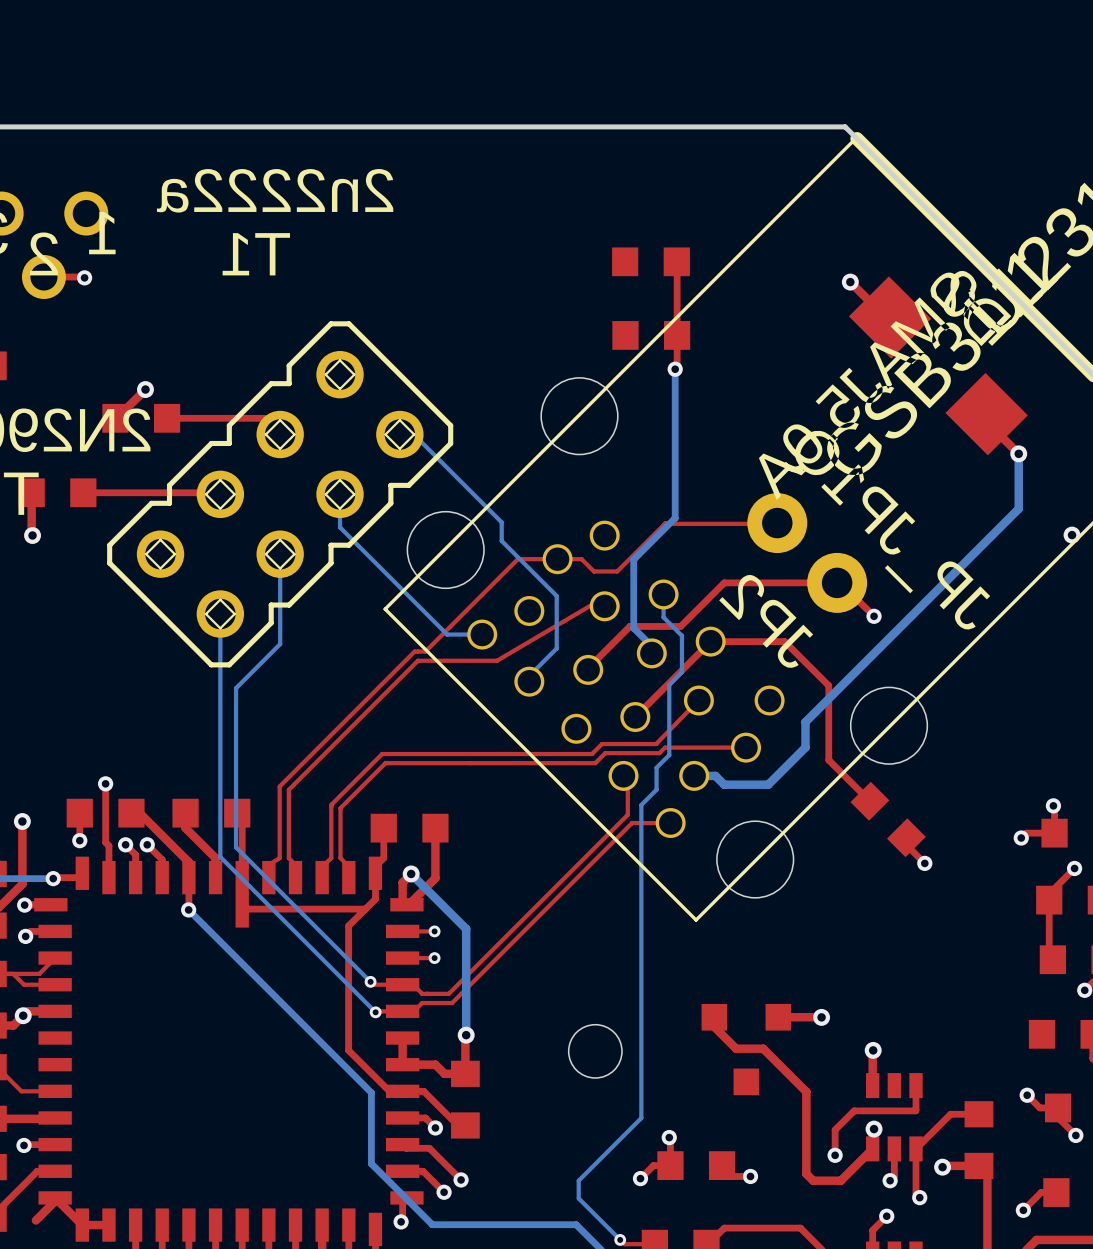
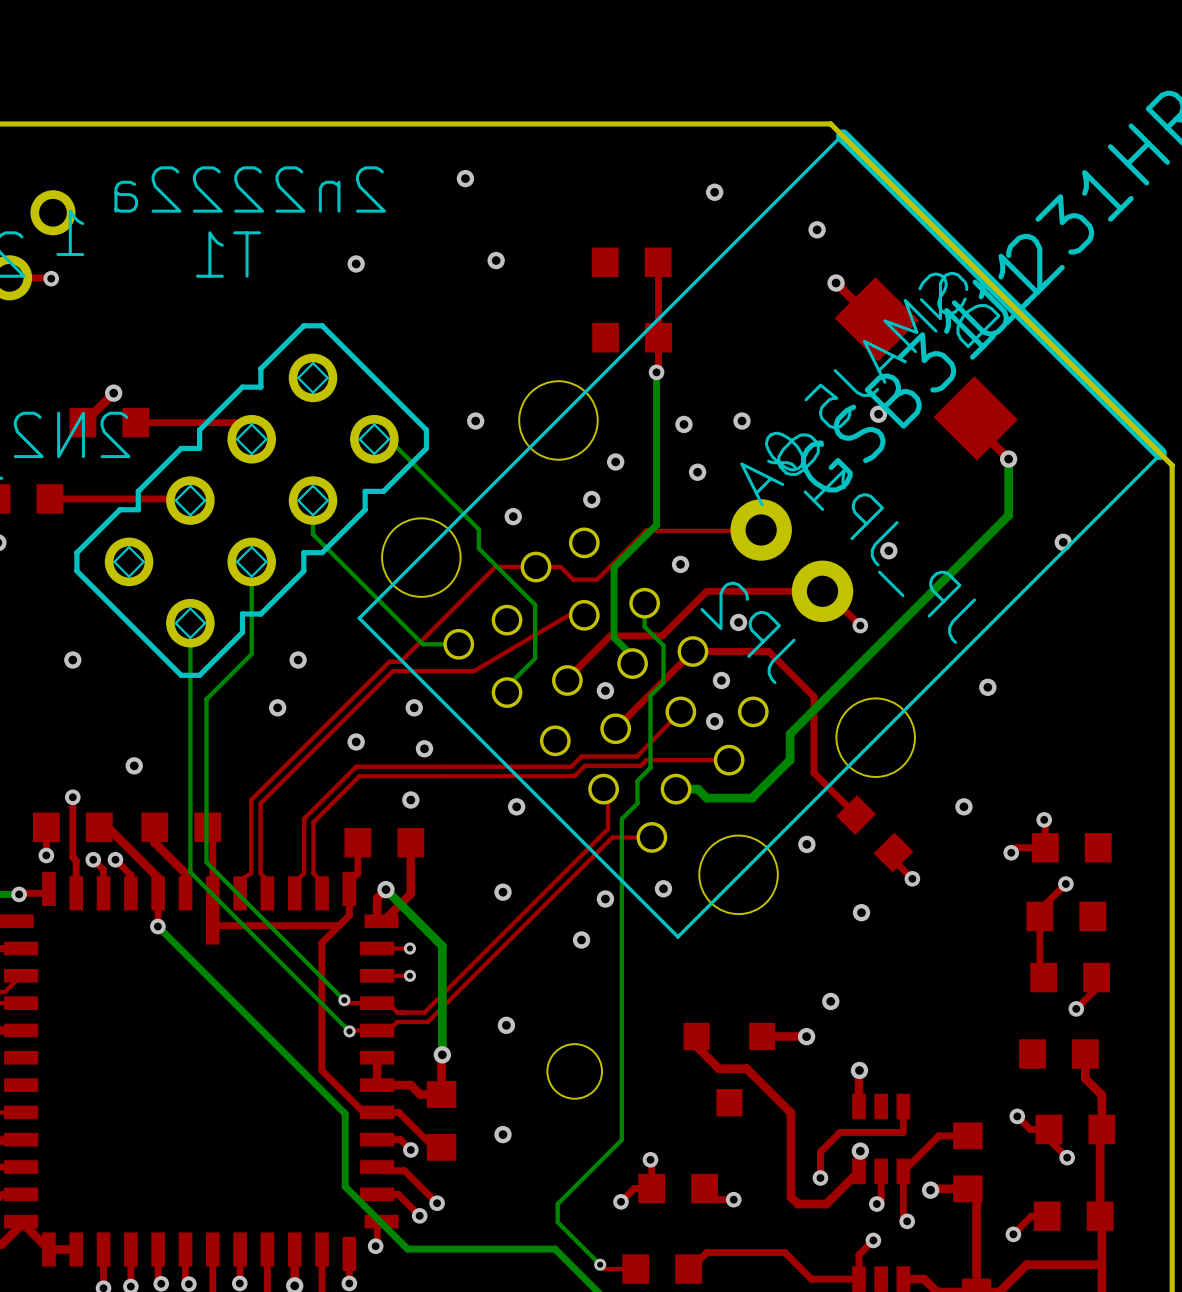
via: none -> (465, 178)
via: none -> (714, 192)
via: none -> (817, 229)
via: none -> (496, 260)
via: none -> (356, 263)
via: none -> (878, 414)
via: none -> (475, 421)
via: none -> (741, 421)
via: none -> (683, 424)
via: none -> (615, 461)
via: none -> (697, 472)
via: none -> (591, 499)
via: none -> (513, 516)
via: none -> (888, 550)
via: none -> (680, 564)
via: none -> (738, 622)
via: none -> (72, 660)
via: none -> (298, 660)
via: none -> (721, 680)
via: none -> (987, 687)
via: none -> (605, 690)
via: none -> (277, 707)
via: none -> (414, 707)
via: none -> (714, 721)
via: none -> (356, 741)
via: none -> (424, 748)
via: none -> (134, 765)
via: none -> (410, 800)
via: none -> (516, 806)
via: none -> (963, 806)
via: none -> (806, 844)
via: none -> (663, 888)
via: none -> (503, 892)
via: none -> (605, 899)
via: none -> (861, 912)
via: none -> (581, 939)
via: none -> (830, 1001)
via: none -> (506, 1025)
via: none -> (503, 1134)

